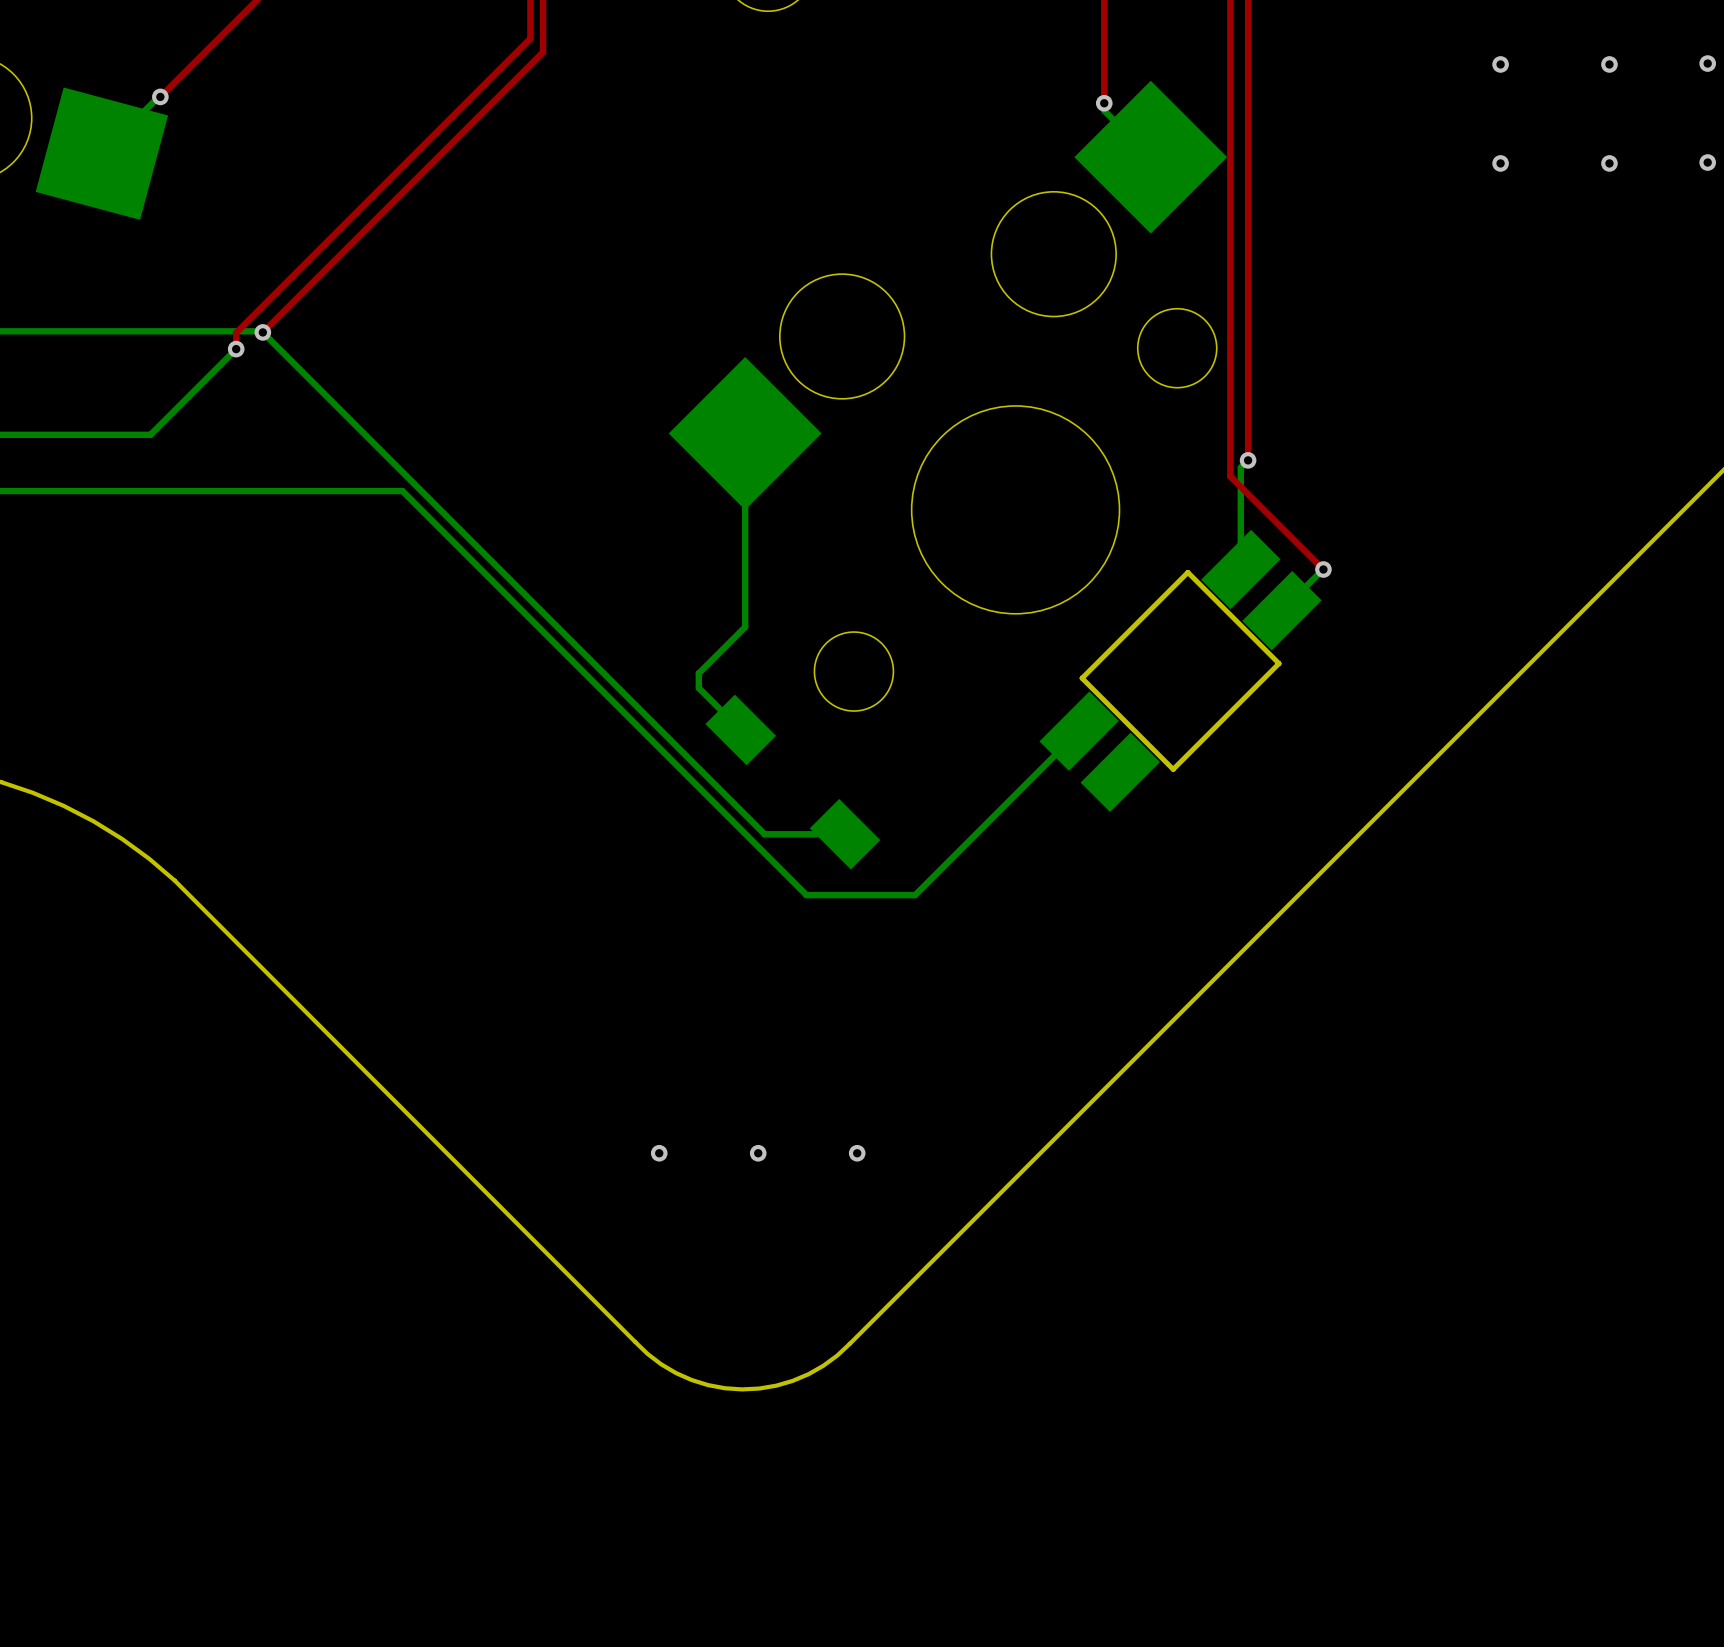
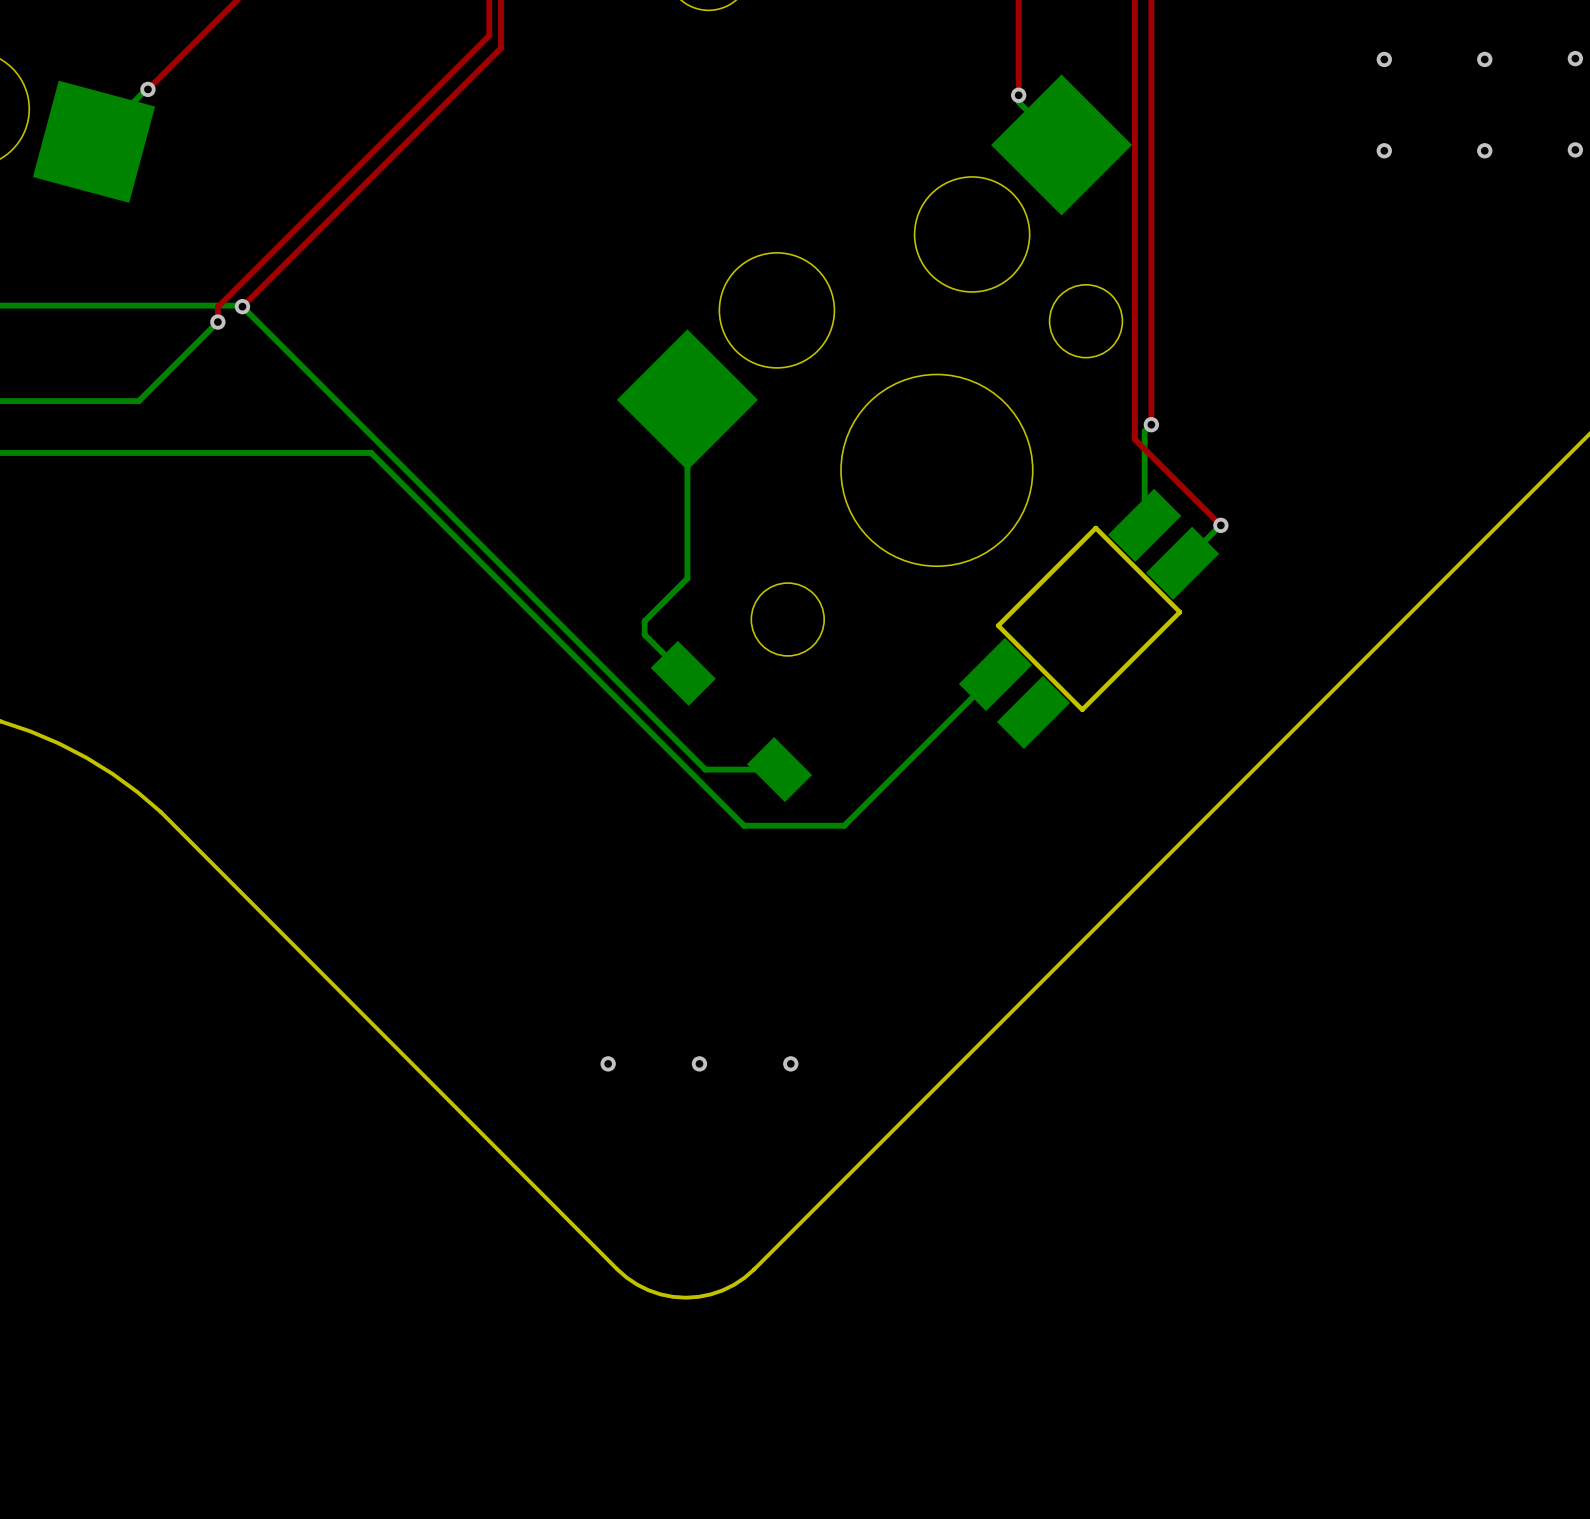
board edge: (635, 1341) (661, 1364) (691, 1380) (724, 1388) (742, 1389) (776, 1385) (808, 1374) (837, 1355) (849, 1343) -> (585, 1237) (617, 1269) (637, 1284) (660, 1294) (685, 1297) (710, 1294) (734, 1284) (754, 1269) (783, 1239)

